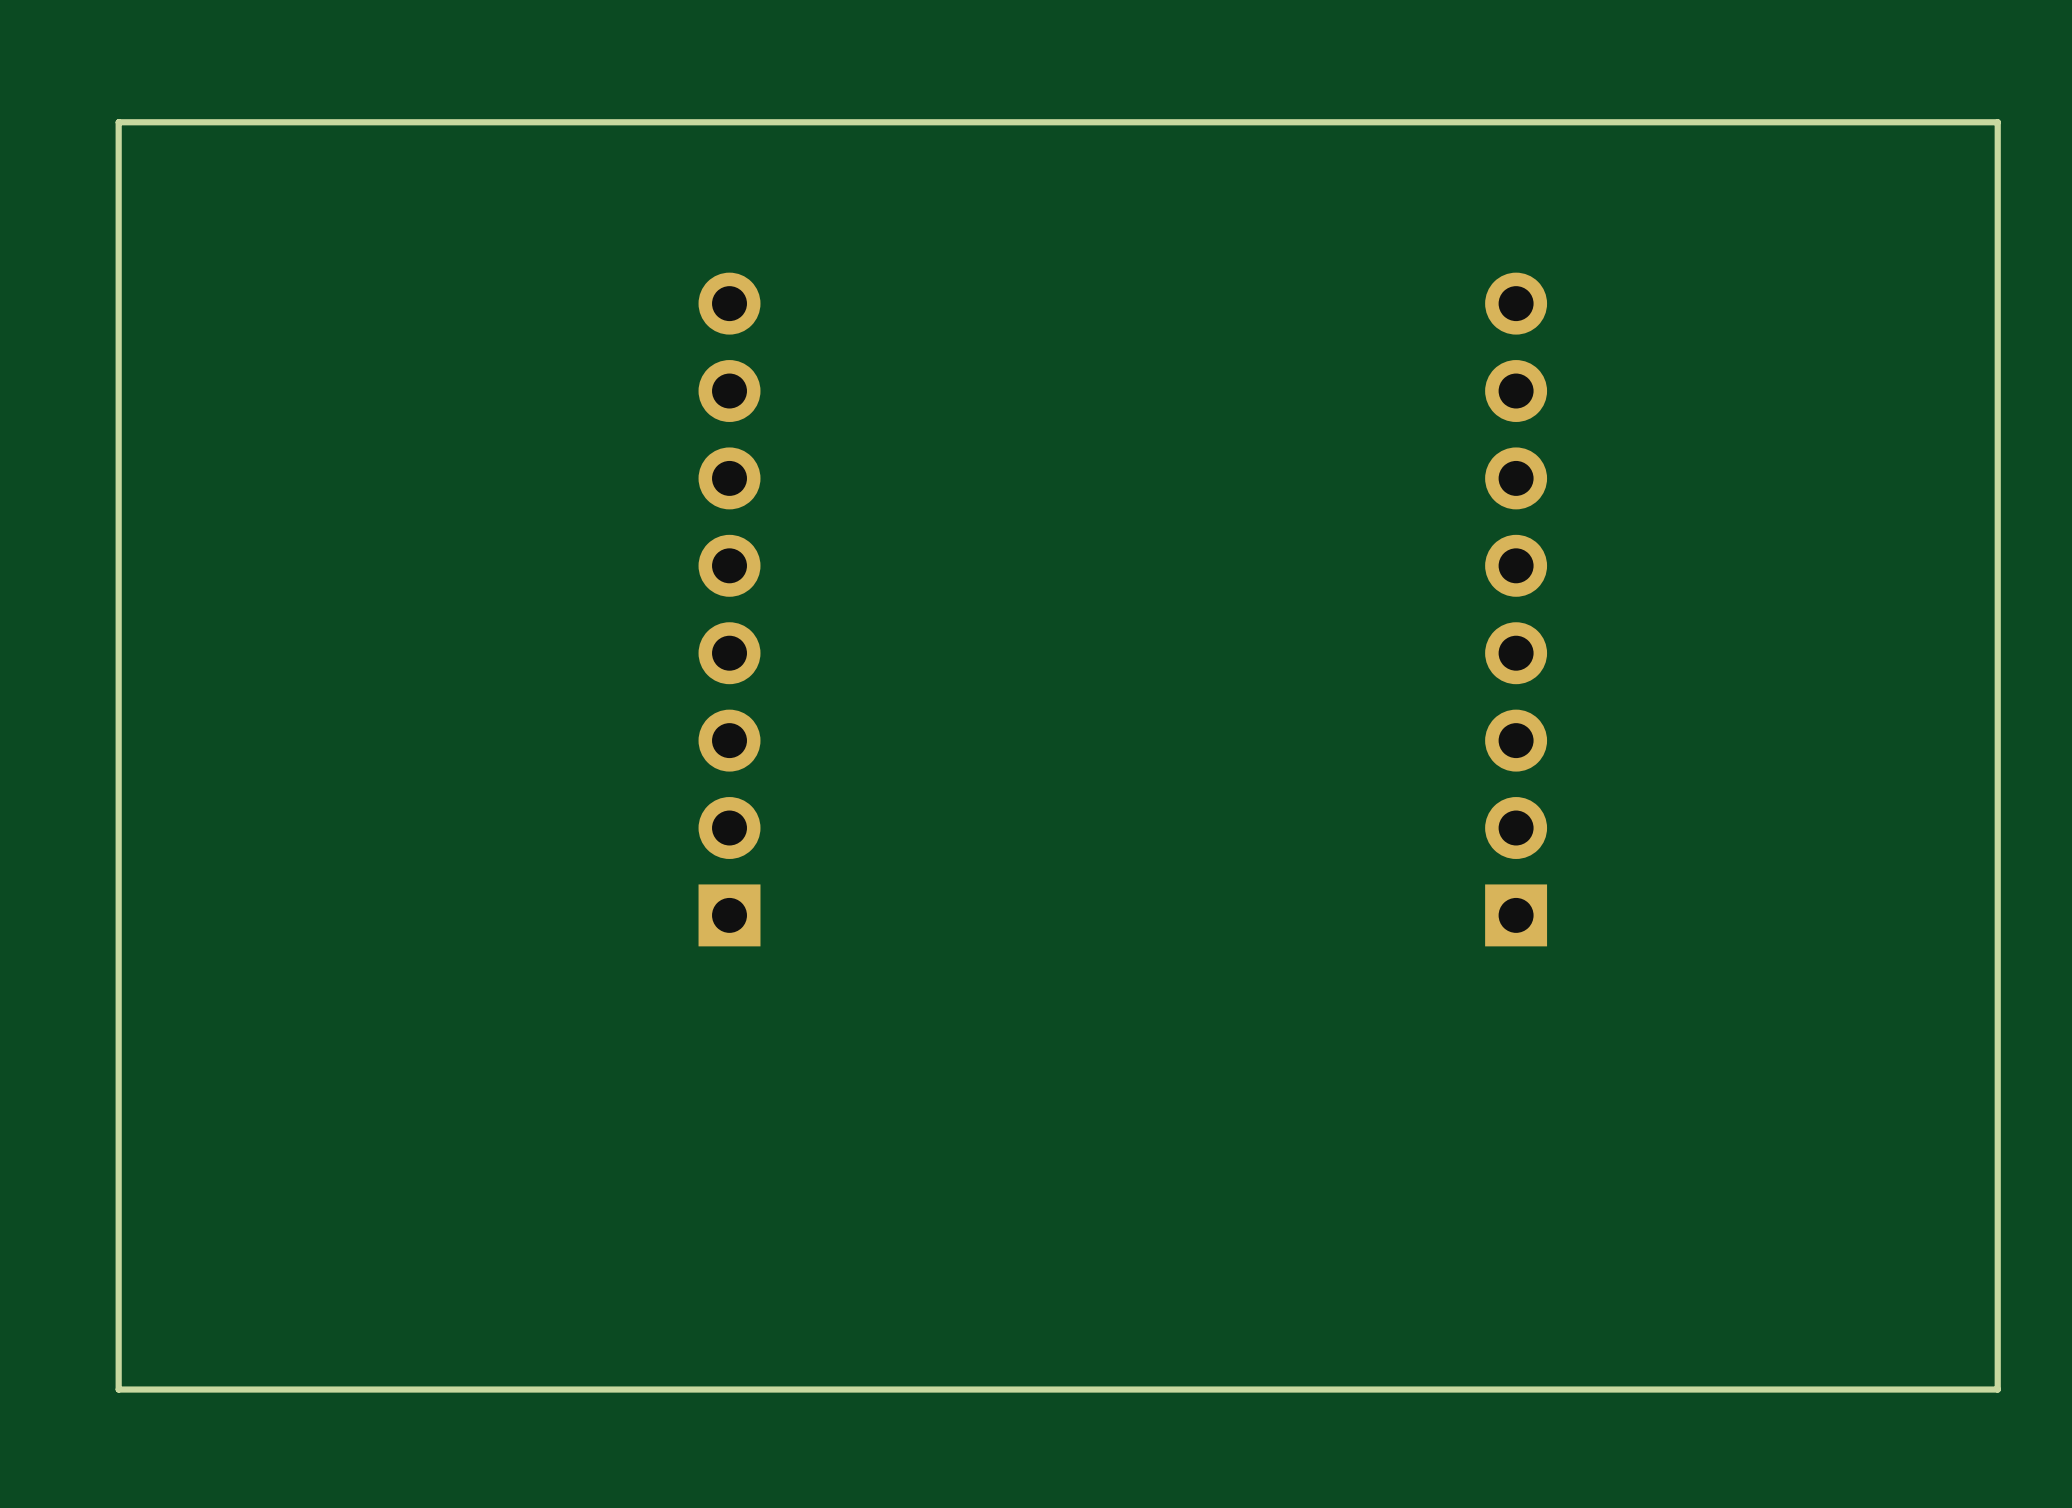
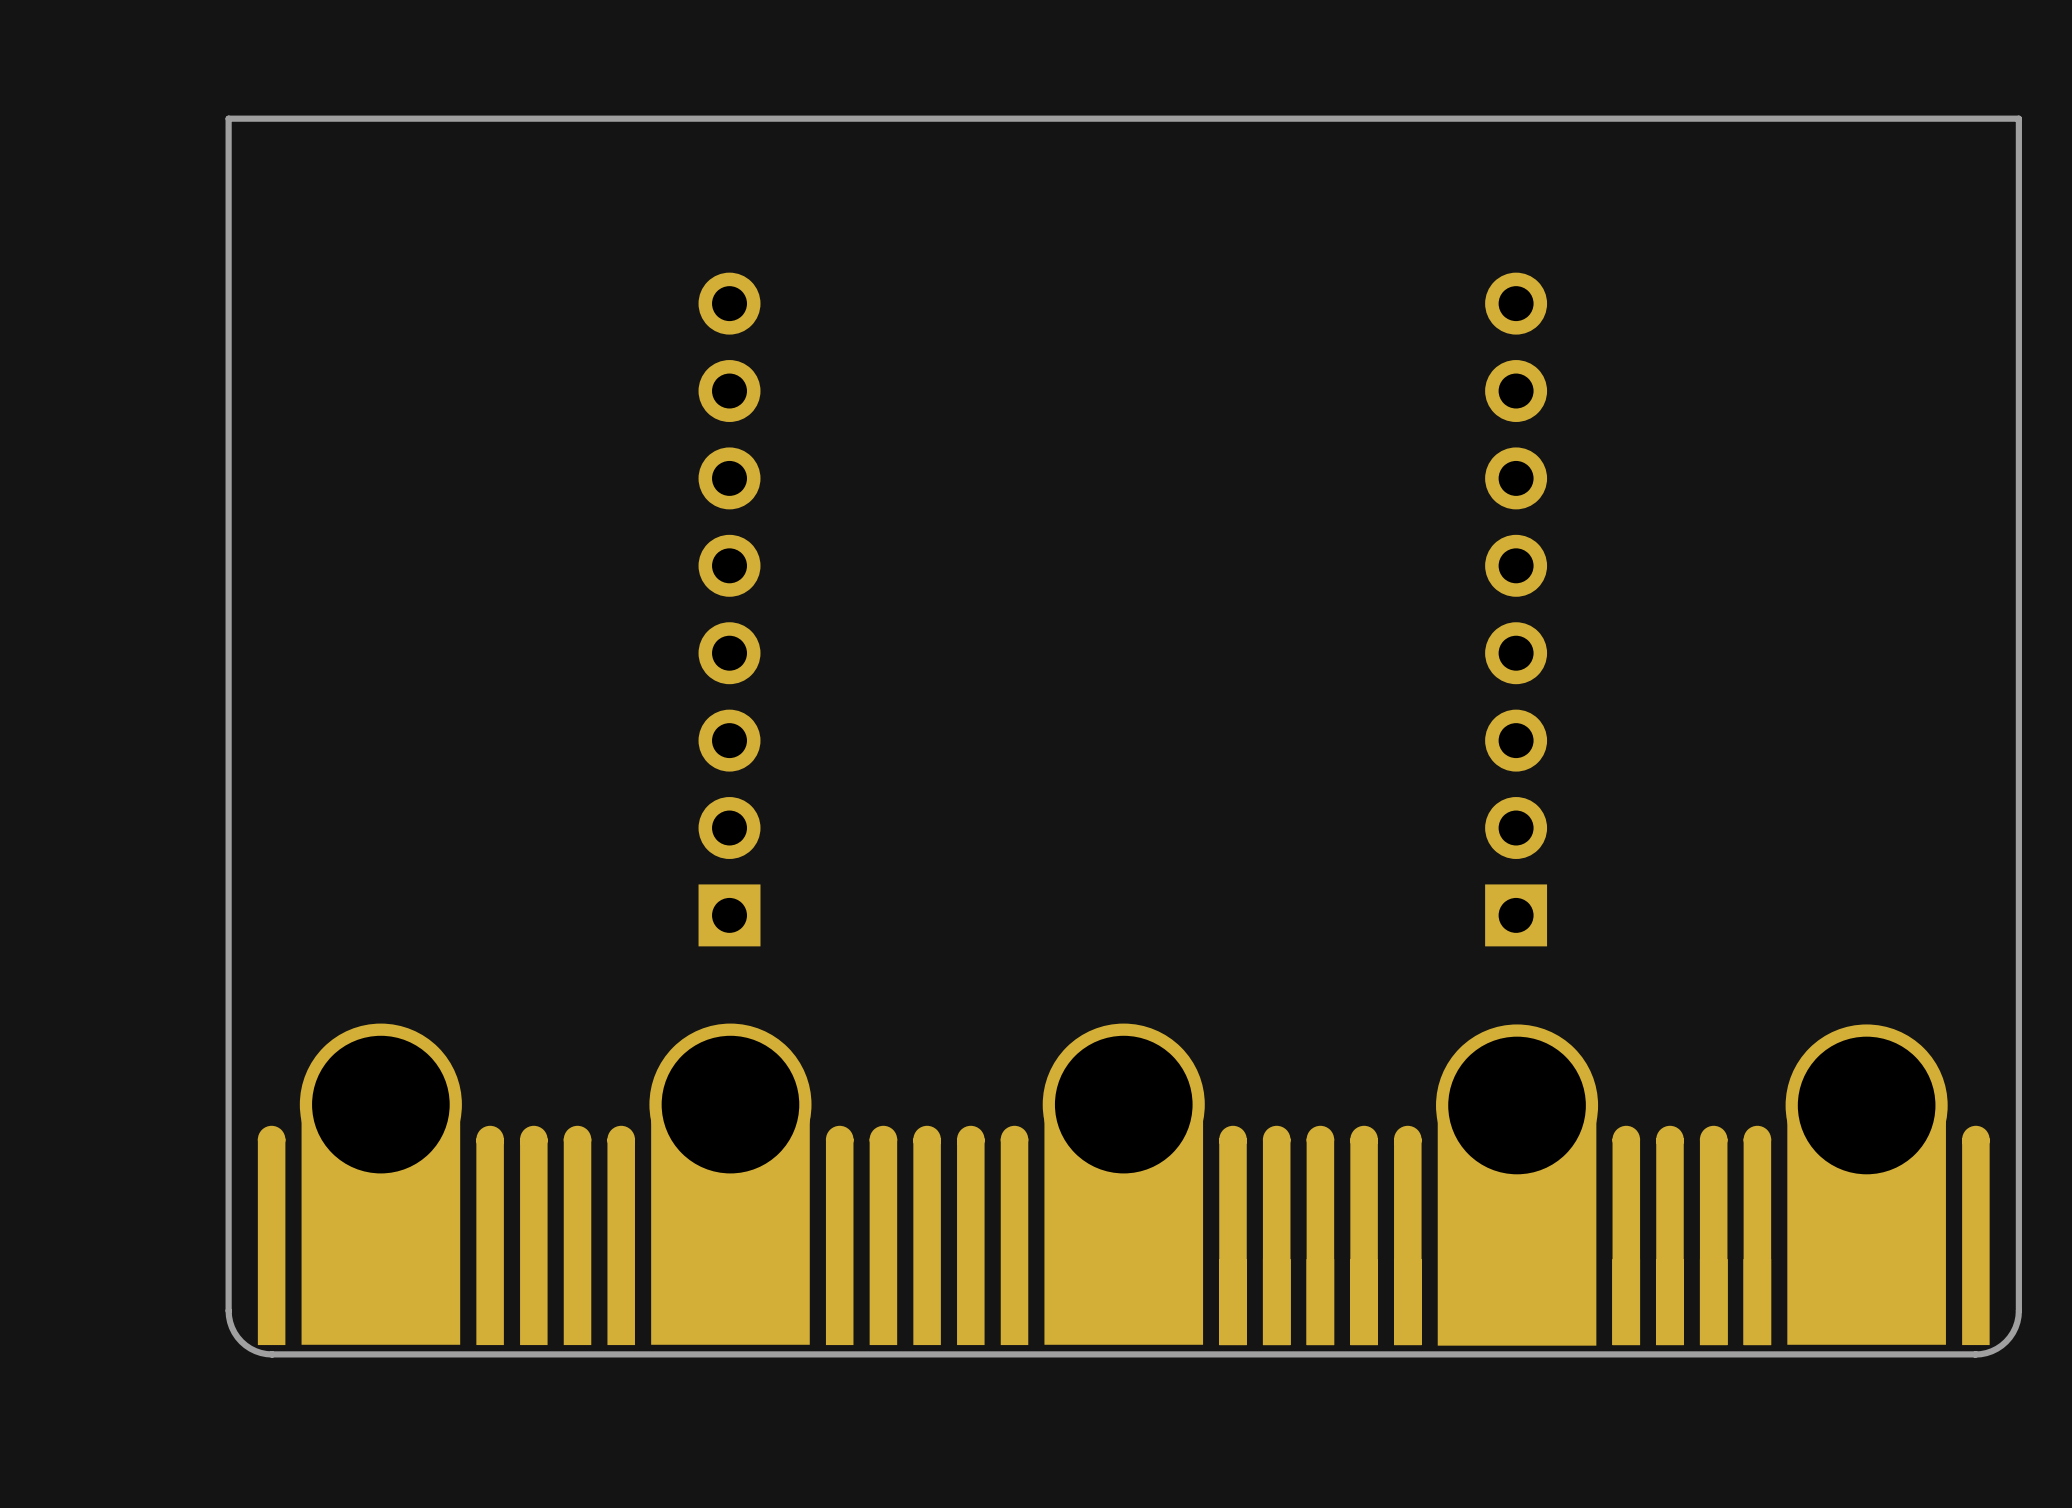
board edge: (1997, 122) (118, 122) (118, 1389) (1997, 1389) (1997, 122) -> none
part: none -> (1123, 1184)
board edge: none -> (1975, 1354) (271, 1354)
board edge: none -> (1975, 1354) (1991, 1351) (2006, 1341) (2015, 1327) (2018, 1310) (2018, 118) (228, 118) (228, 1310) (231, 1327) (241, 1341) (255, 1351) (272, 1354)

